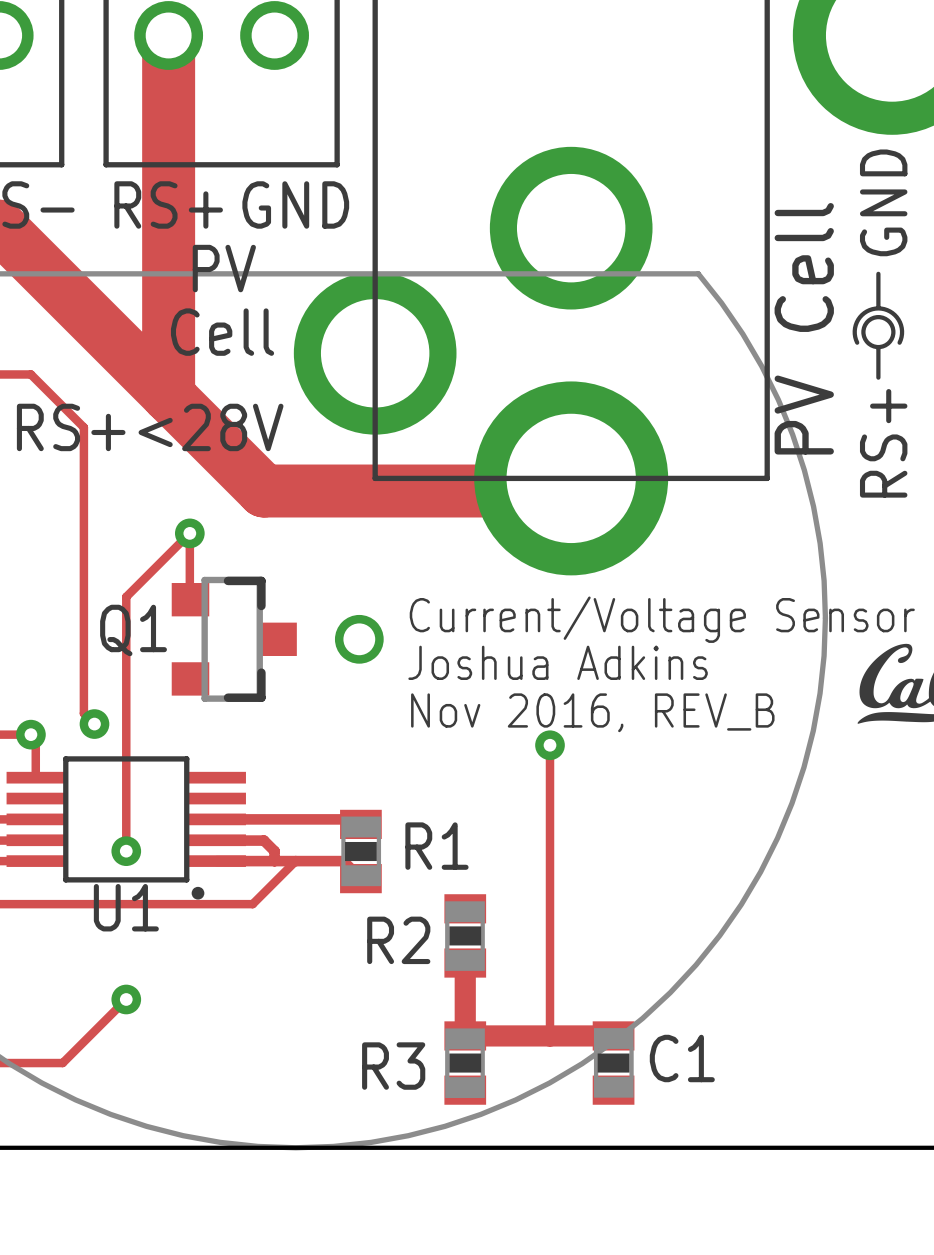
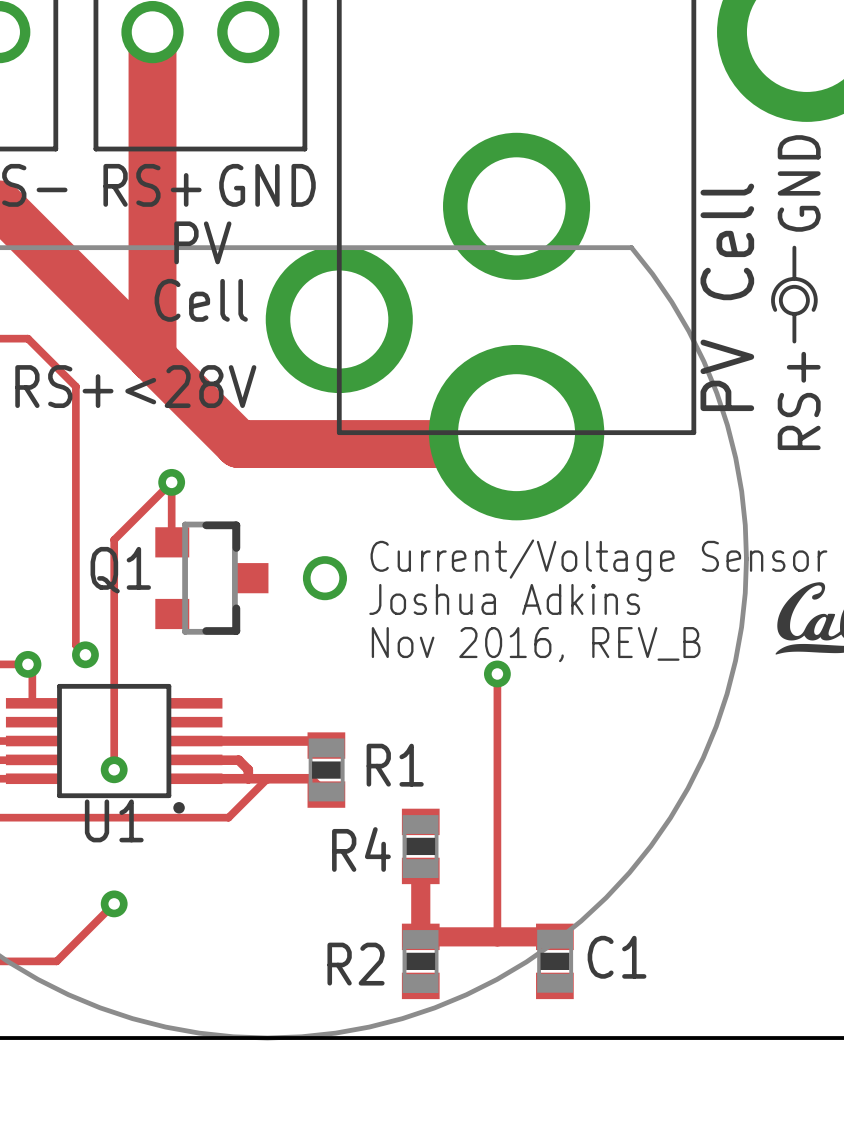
R2 name: R2 (398, 940) -> R4 (361, 849)
R3 name: R3 (393, 1066) -> R2 (356, 964)

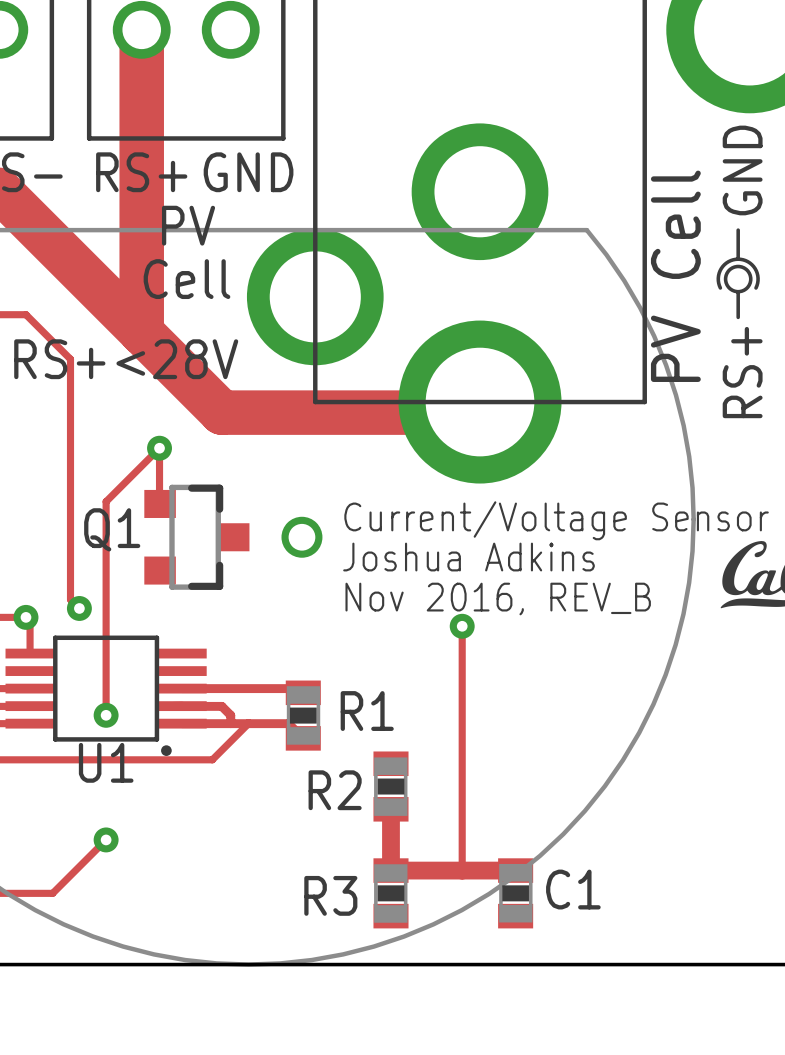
R4 name: R4 (361, 849) -> R2 (335, 790)
R2 name: R2 (356, 964) -> R3 (330, 895)

